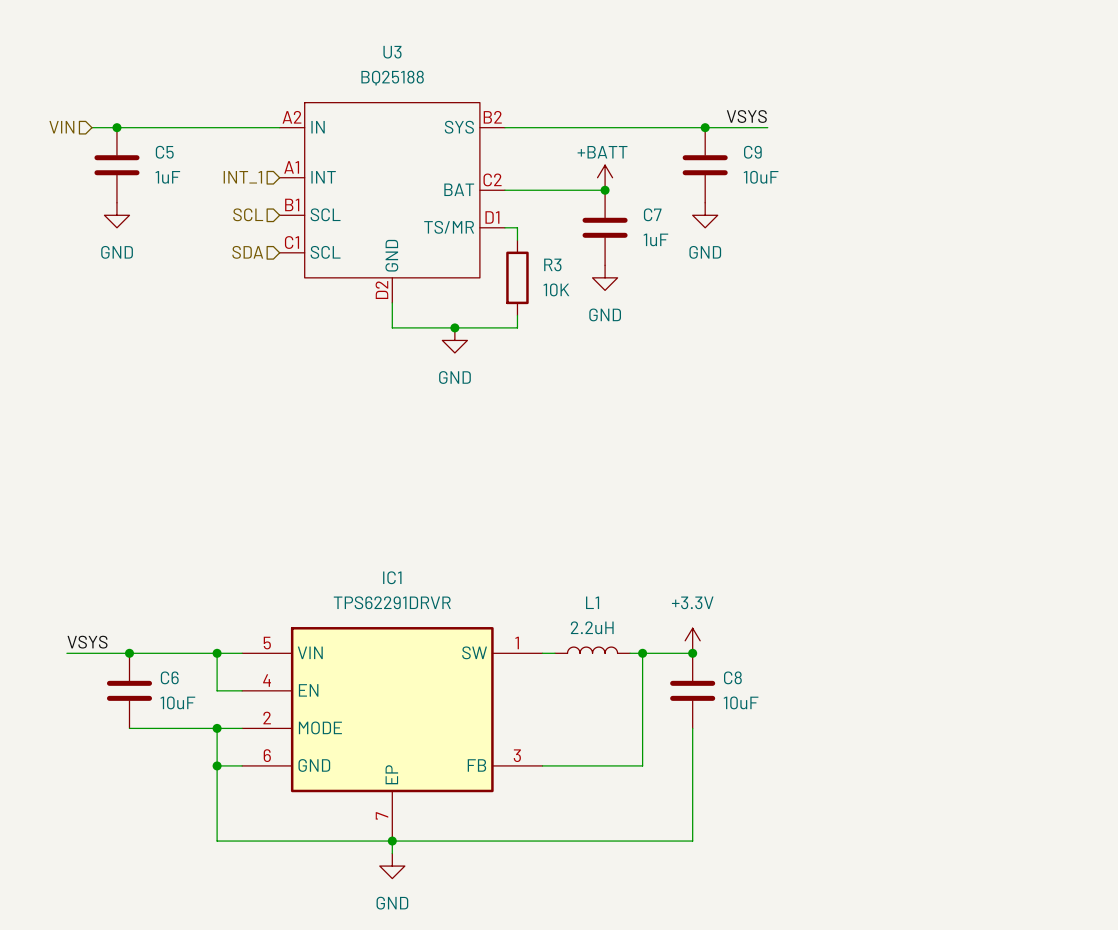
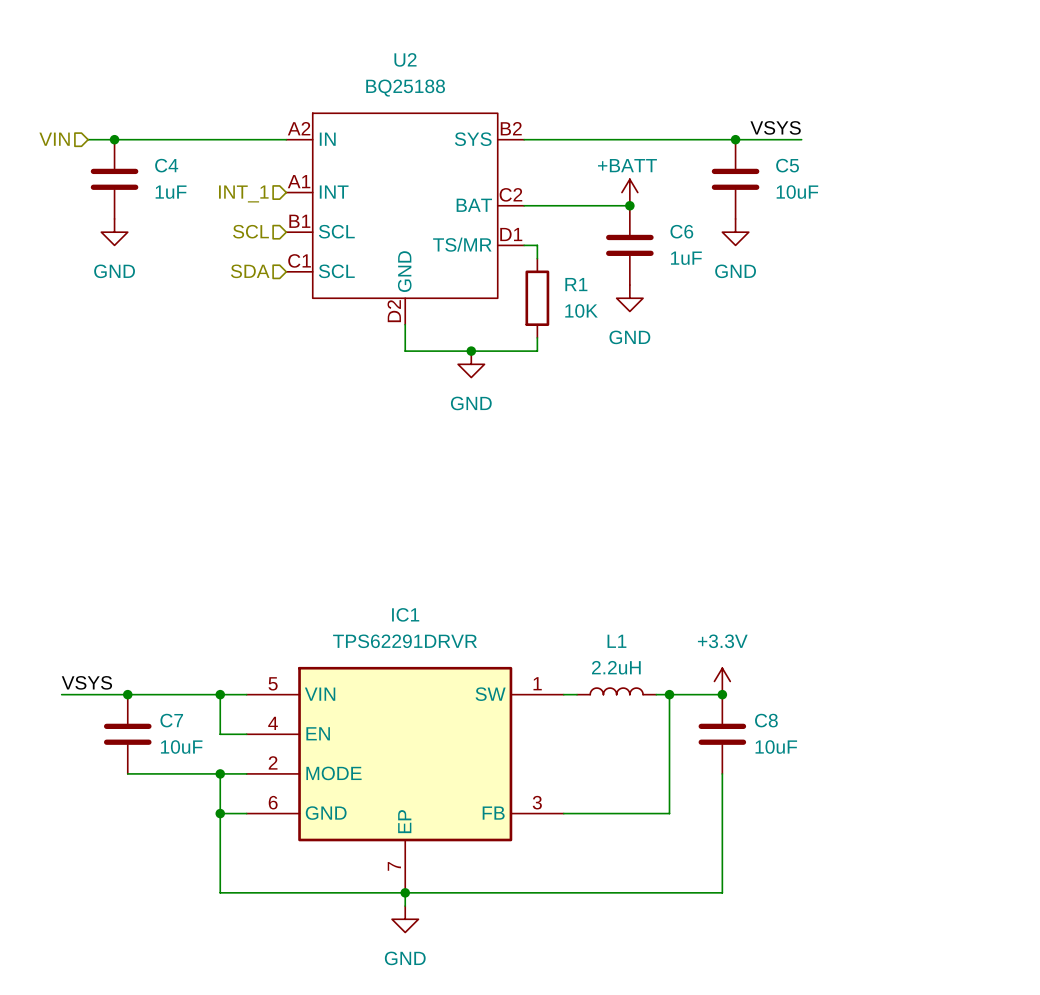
U3 name: U3 (392, 52) -> U2 (405, 59)
C5 name: C5 (164, 152) -> C4 (166, 165)
C9 name: C9 (752, 152) -> C5 (787, 165)
C7 name: C7 (652, 214) -> C6 (681, 231)
R3 name: R3 (552, 264) -> R1 (576, 284)
C6 name: C6 (169, 677) -> C7 (171, 720)

